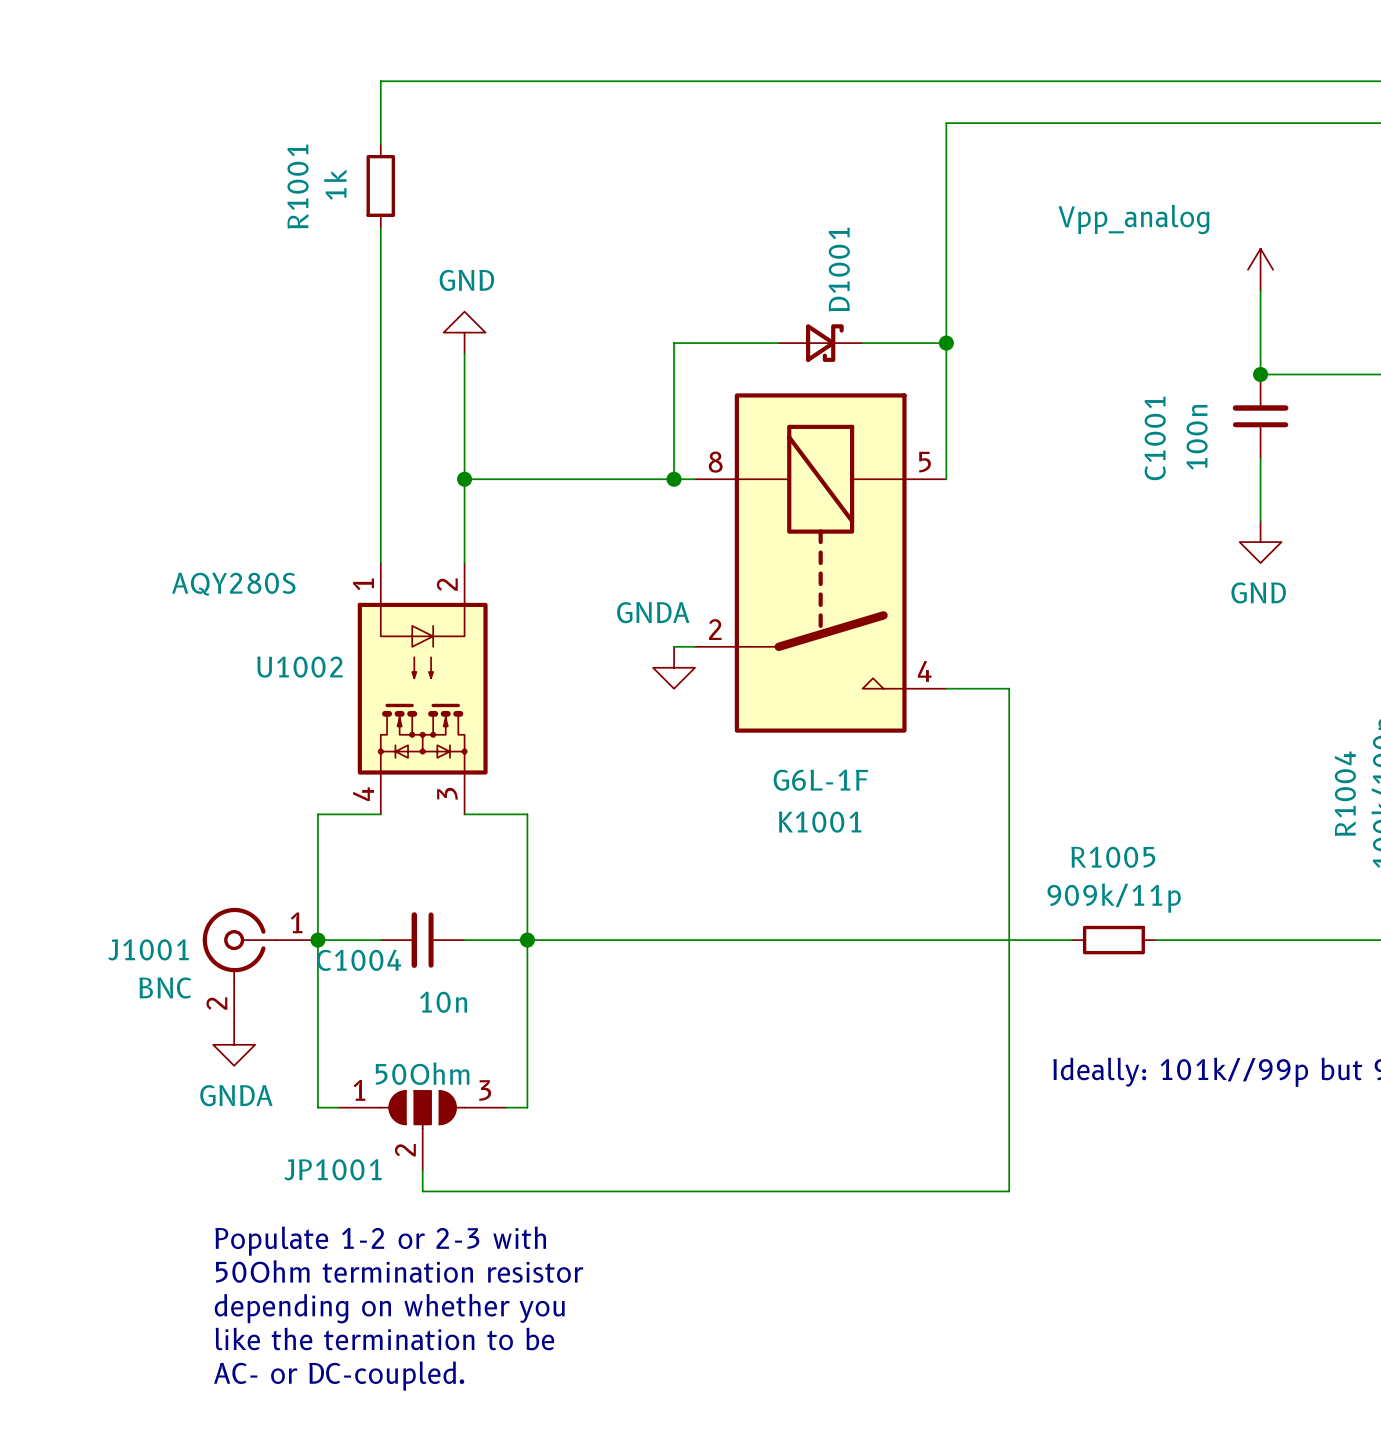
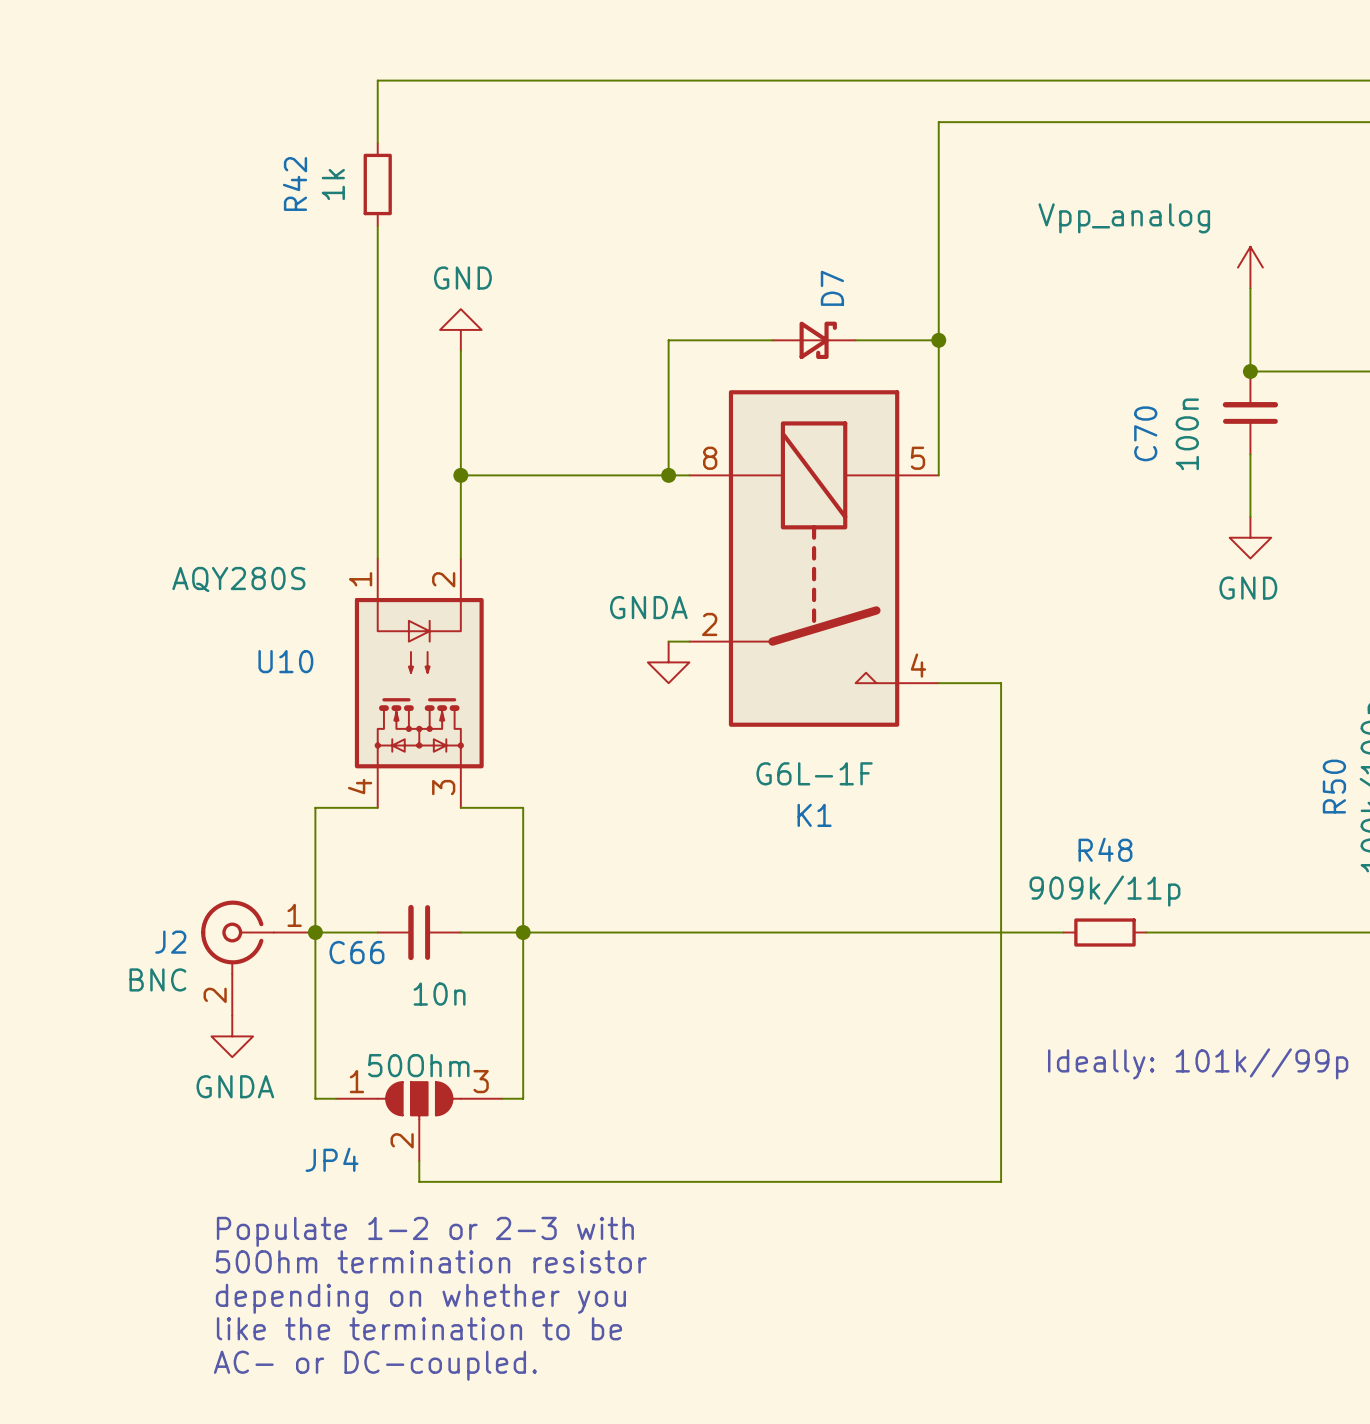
R1001 name: R1001 (298, 186) -> R42 (295, 183)
D1001 name: D1001 (839, 269) -> D7 (832, 288)
C1001 name: C1001 (1155, 438) -> C70 (1145, 433)
U1002 name: U1002 (299, 667) -> U10 (285, 661)
R1004 name: R1004 (1345, 793) -> R50 (1334, 786)
K1001 name: K1001 (820, 822) -> K1 (814, 815)
R1005 name: R1005 (1113, 857) -> R48 (1105, 849)
J1001 name: J1001 (148, 949) -> J2 (170, 942)
C1004 name: C1004 (359, 960) -> C66 (356, 952)
JP1001 name: JP1001 (332, 1169) -> JP4 (332, 1159)

